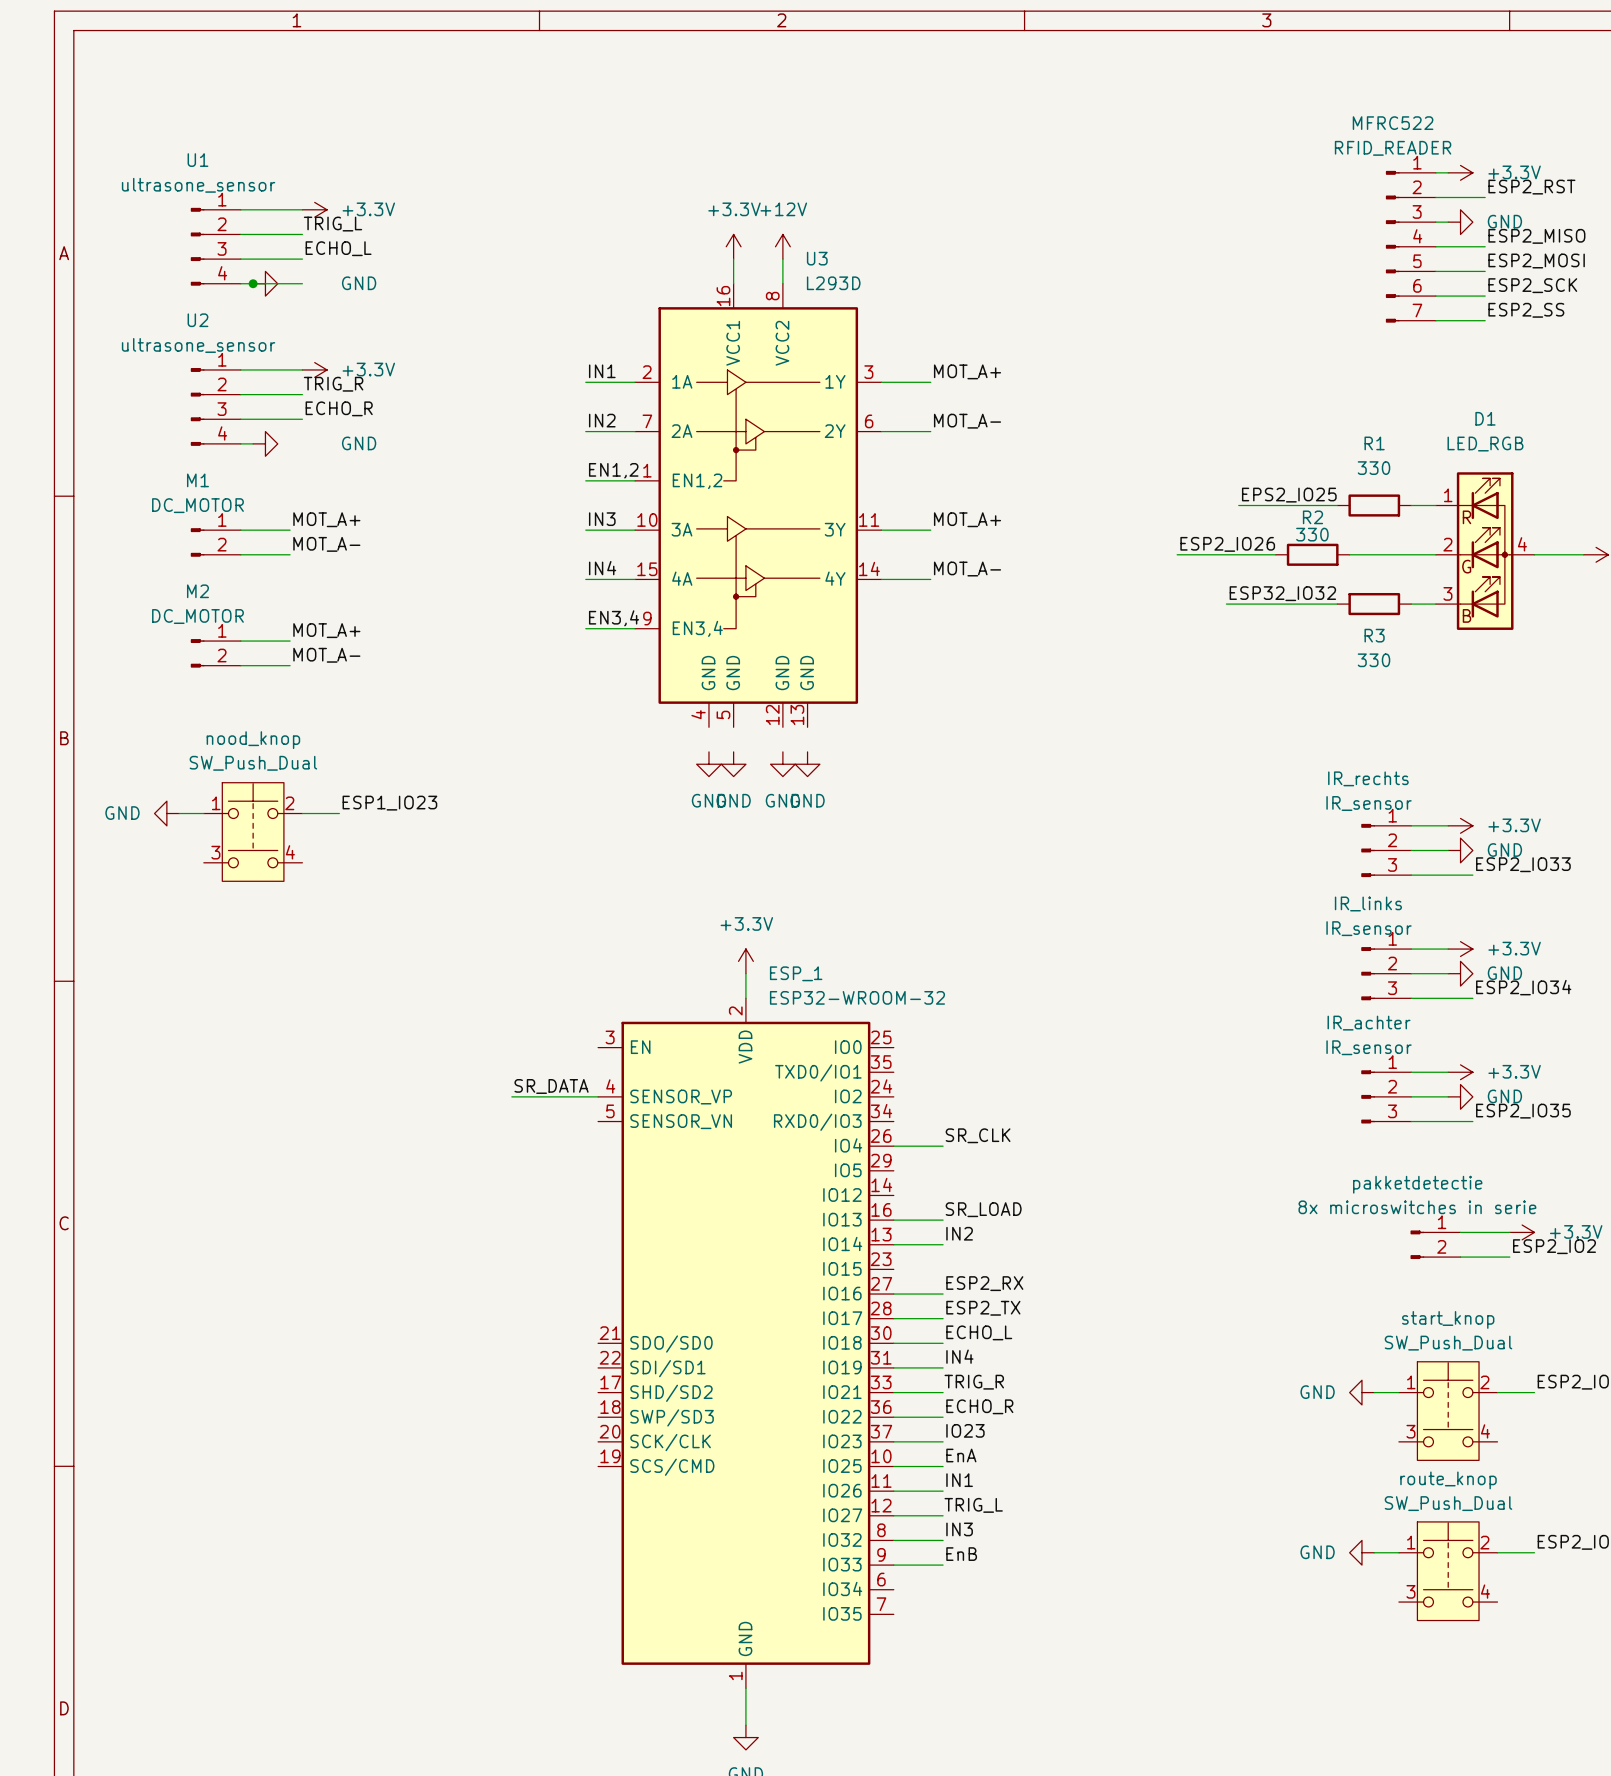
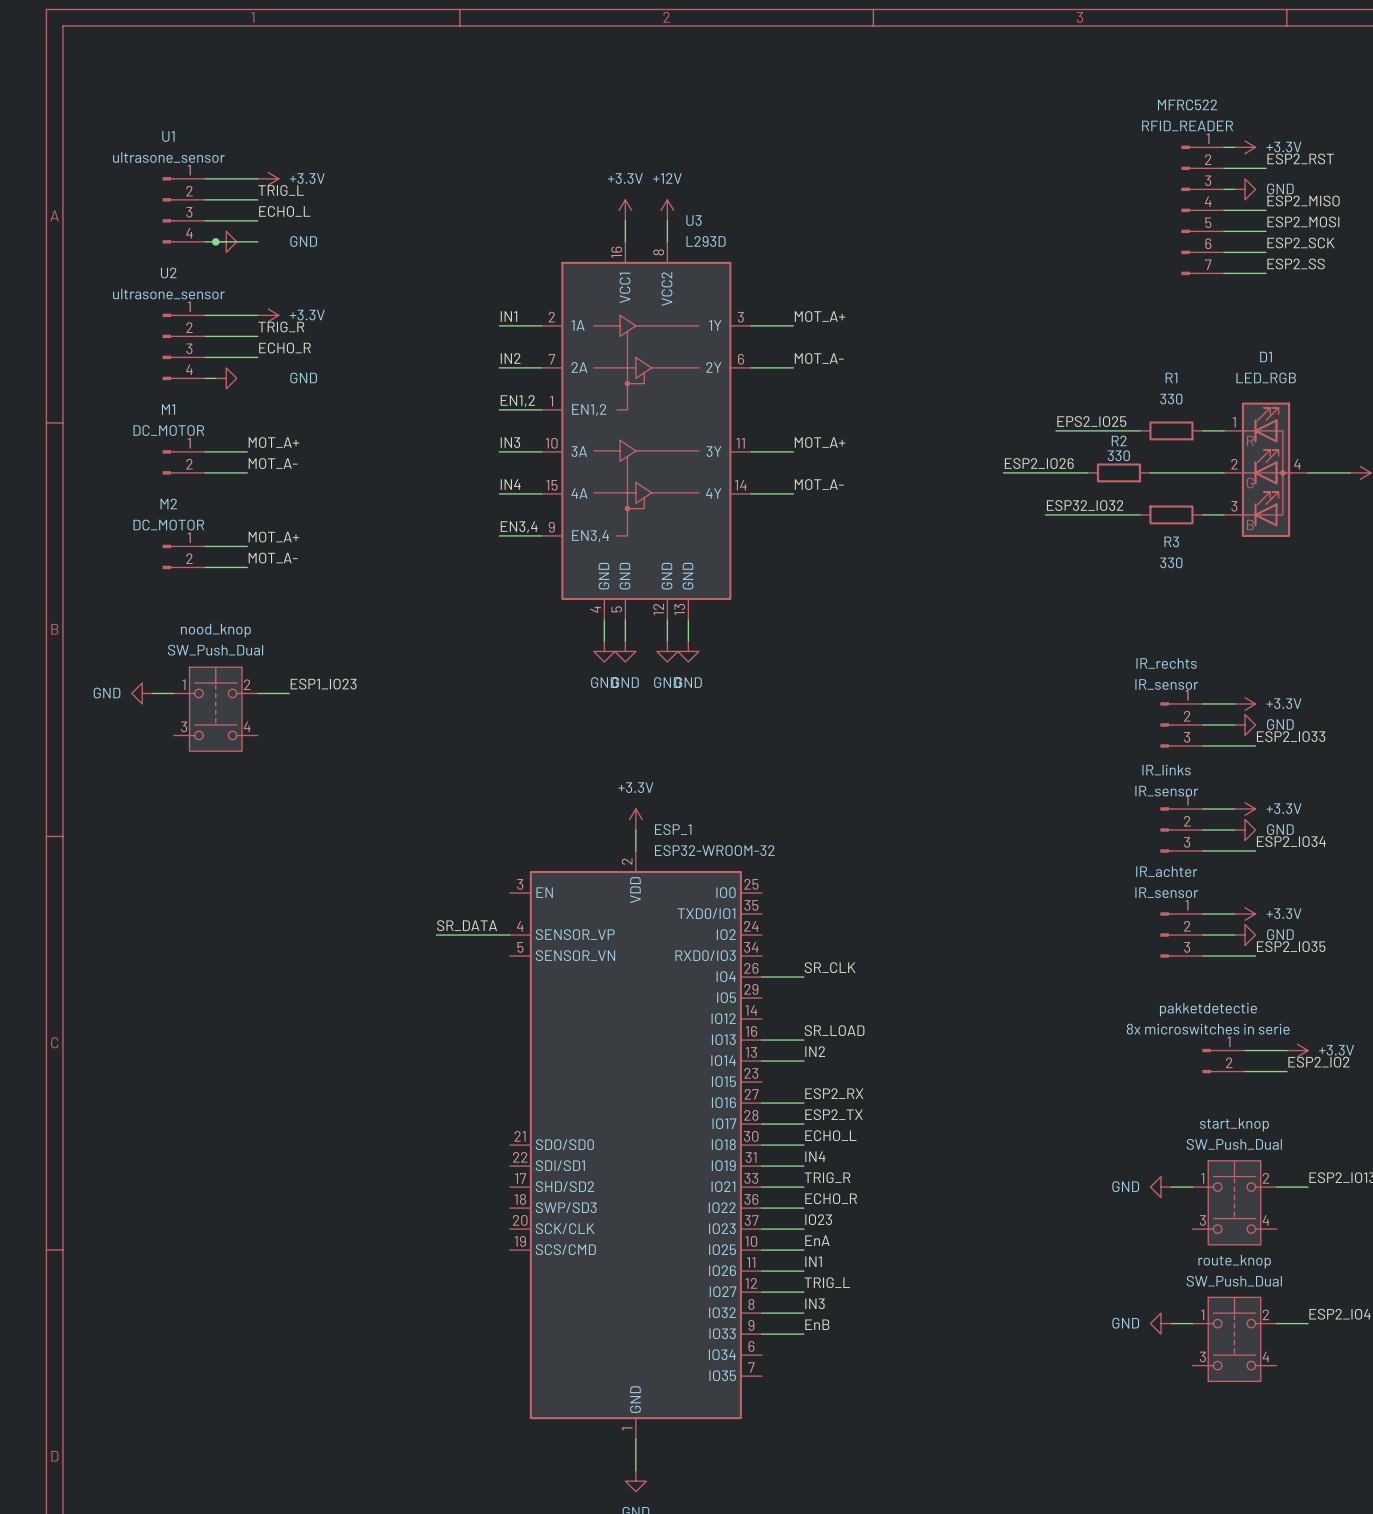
wire: none -> (604, 619) (604, 640)
wire: none -> (625, 619) (625, 640)
wire: none -> (667, 619) (667, 640)
wire: none -> (688, 619) (688, 640)

